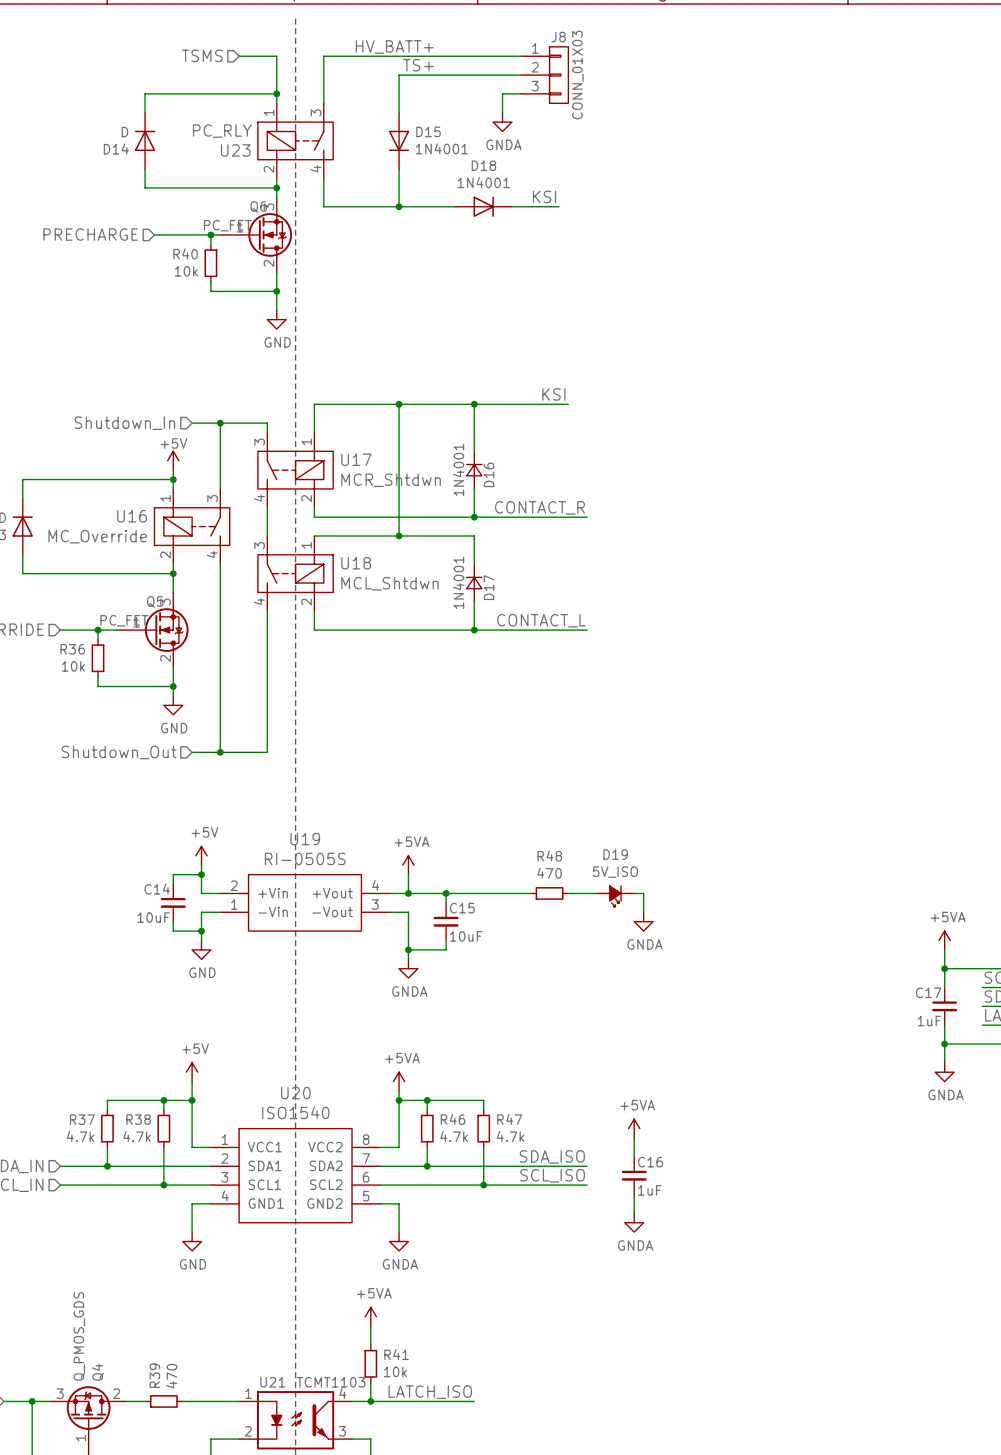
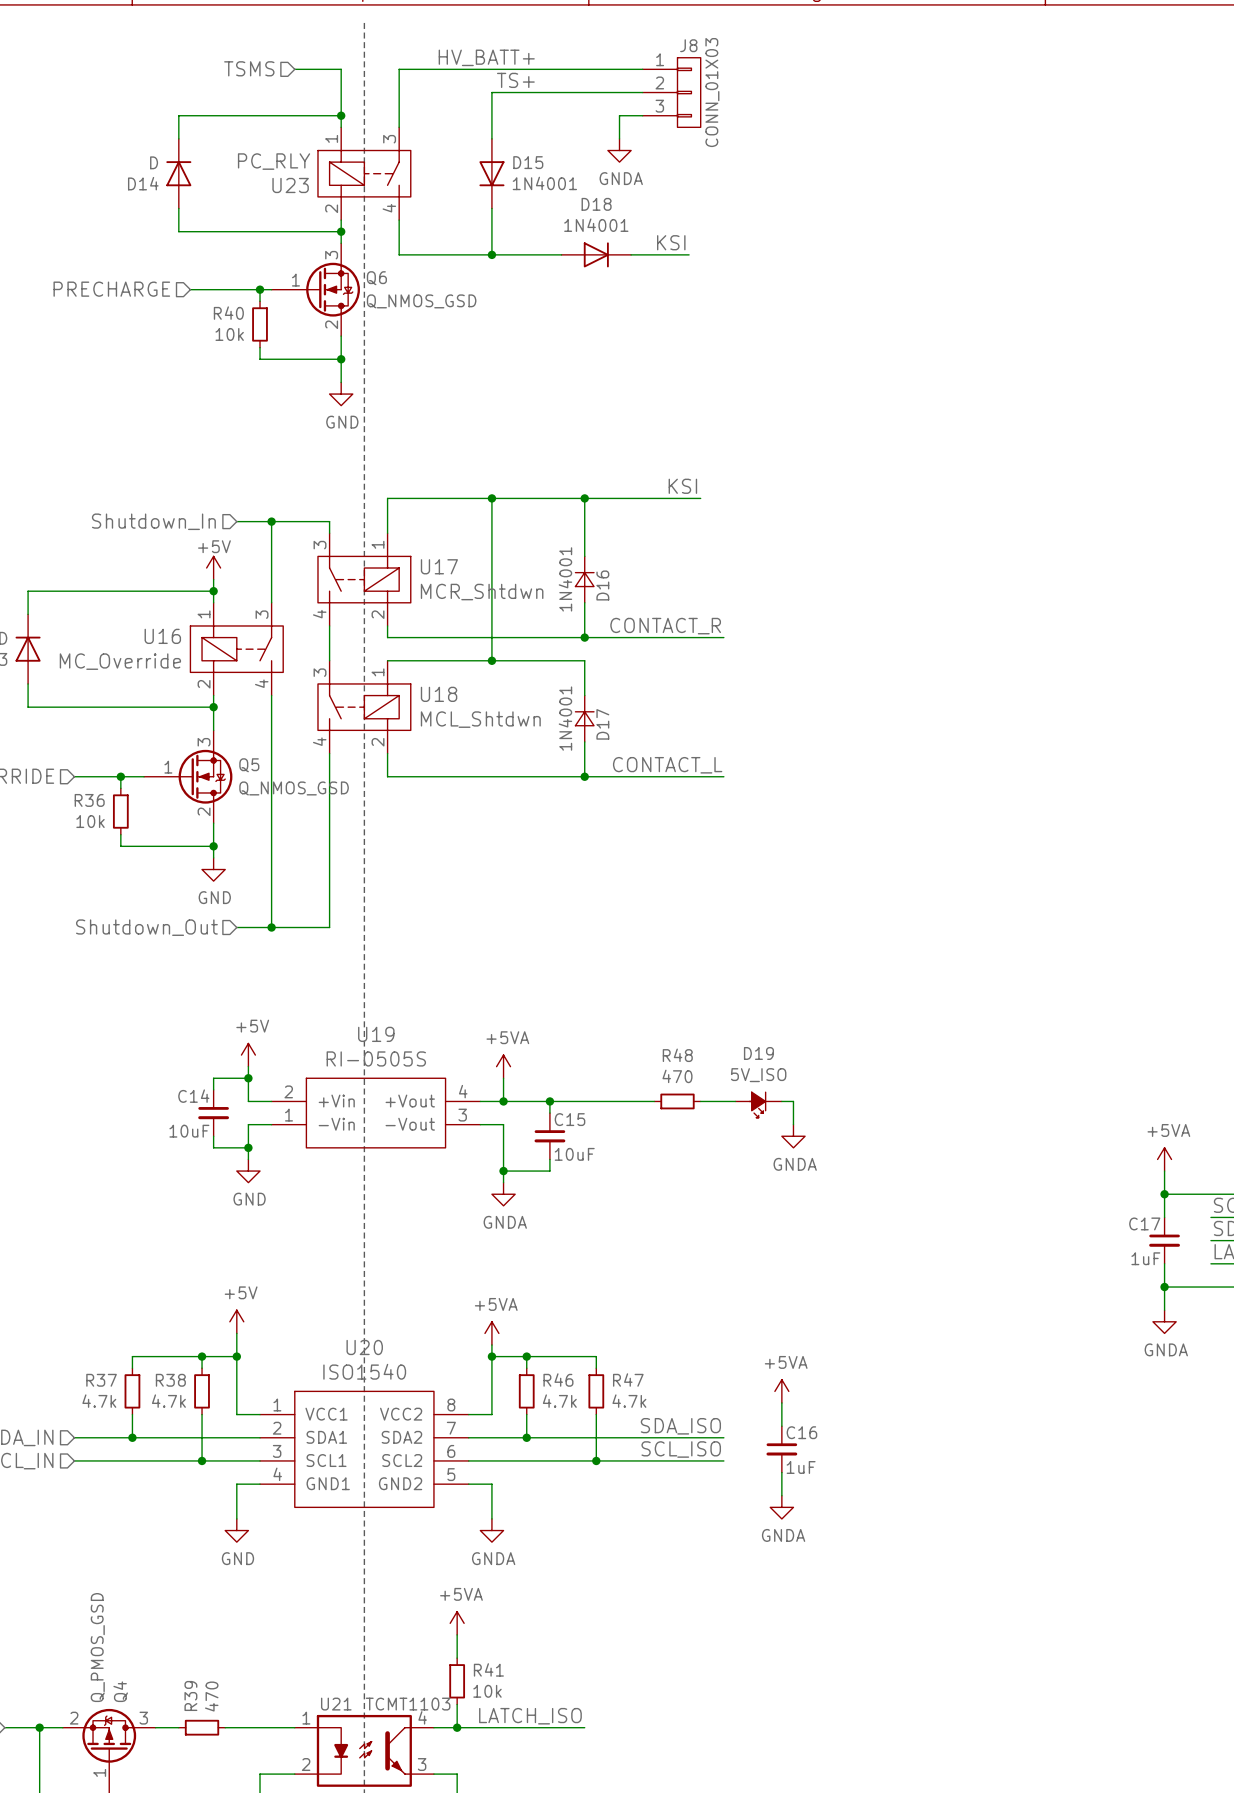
Q6 name position: Q6 (258, 206) -> Q6 (376, 278)
Q6 value: PC_FET (227, 225) -> Q_NMOS_GSD (421, 301)
Q5 name position: Q5 (155, 601) -> Q5 (249, 765)
Q5 value: PC_FET (124, 620) -> Q_NMOS_GSD (294, 788)
Q4 value: Q_PMOS_GDS (79, 1336) -> Q_PMOS_GSD (97, 1647)
Q4 pin number: 3 (60, 1393) -> 2 (74, 1718)
Q4 pin number: 2 (116, 1393) -> 3 (143, 1718)

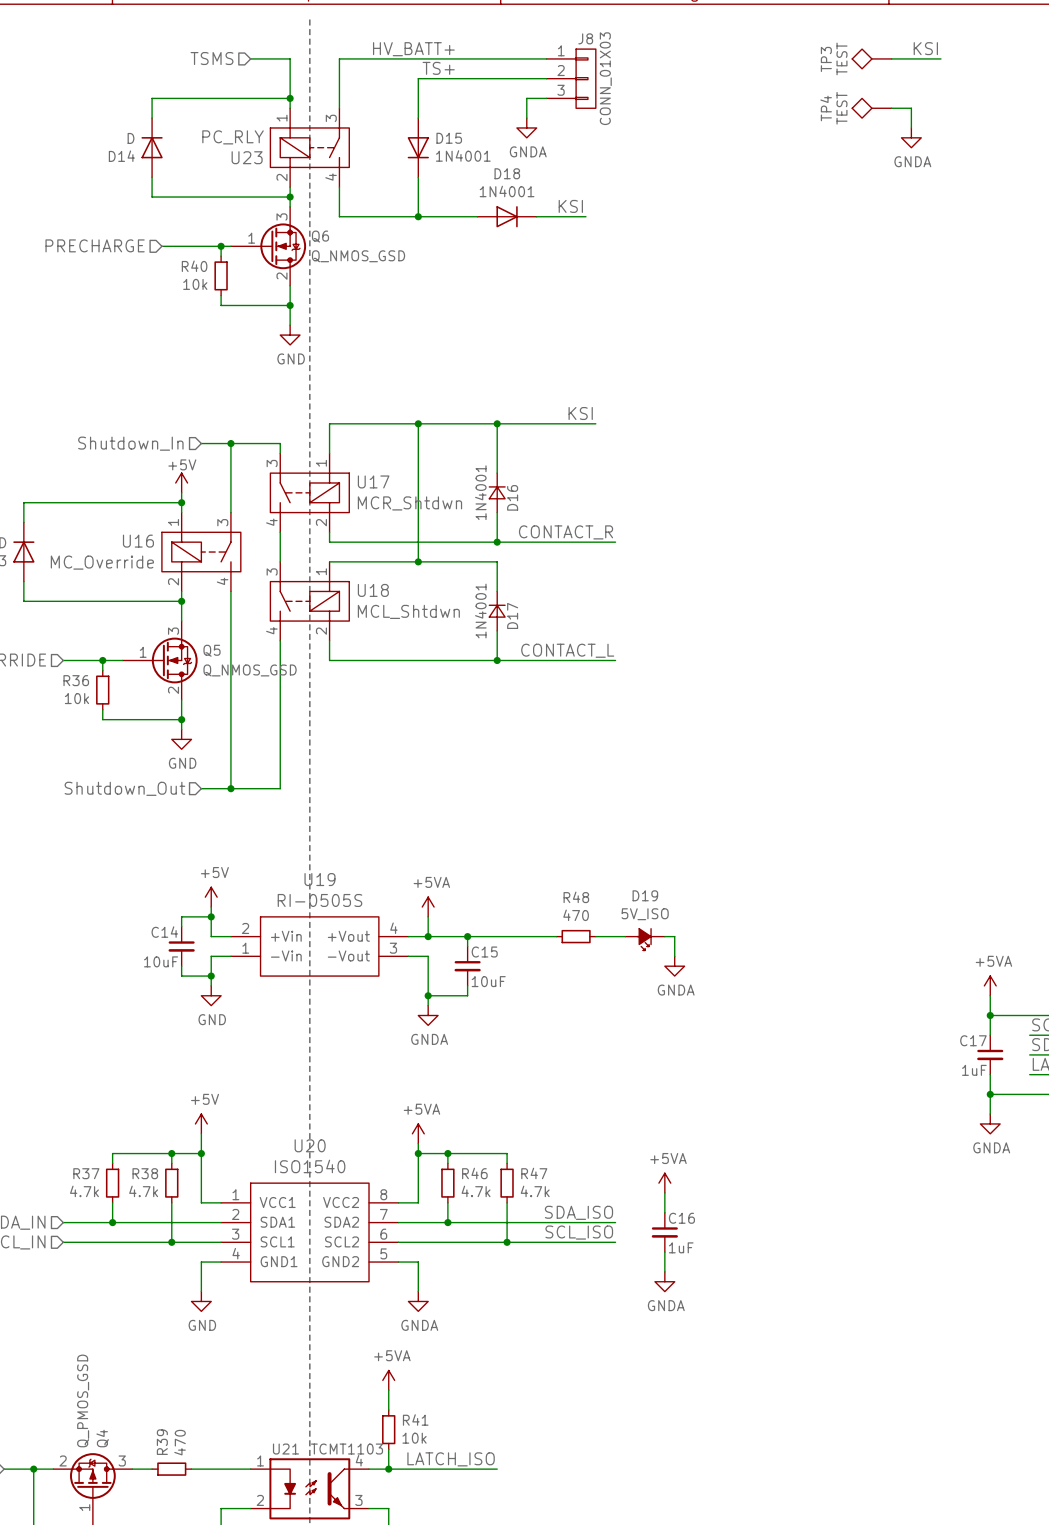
label: none -> KSI (925, 48)
TP3: none -> TEST (871, 58)
wire: none -> (891, 58) (940, 58)
TP4: none -> TEST (871, 108)
wire: none -> (891, 108) (911, 108) (911, 127)
power symbol: none -> GNDA (911, 137)

